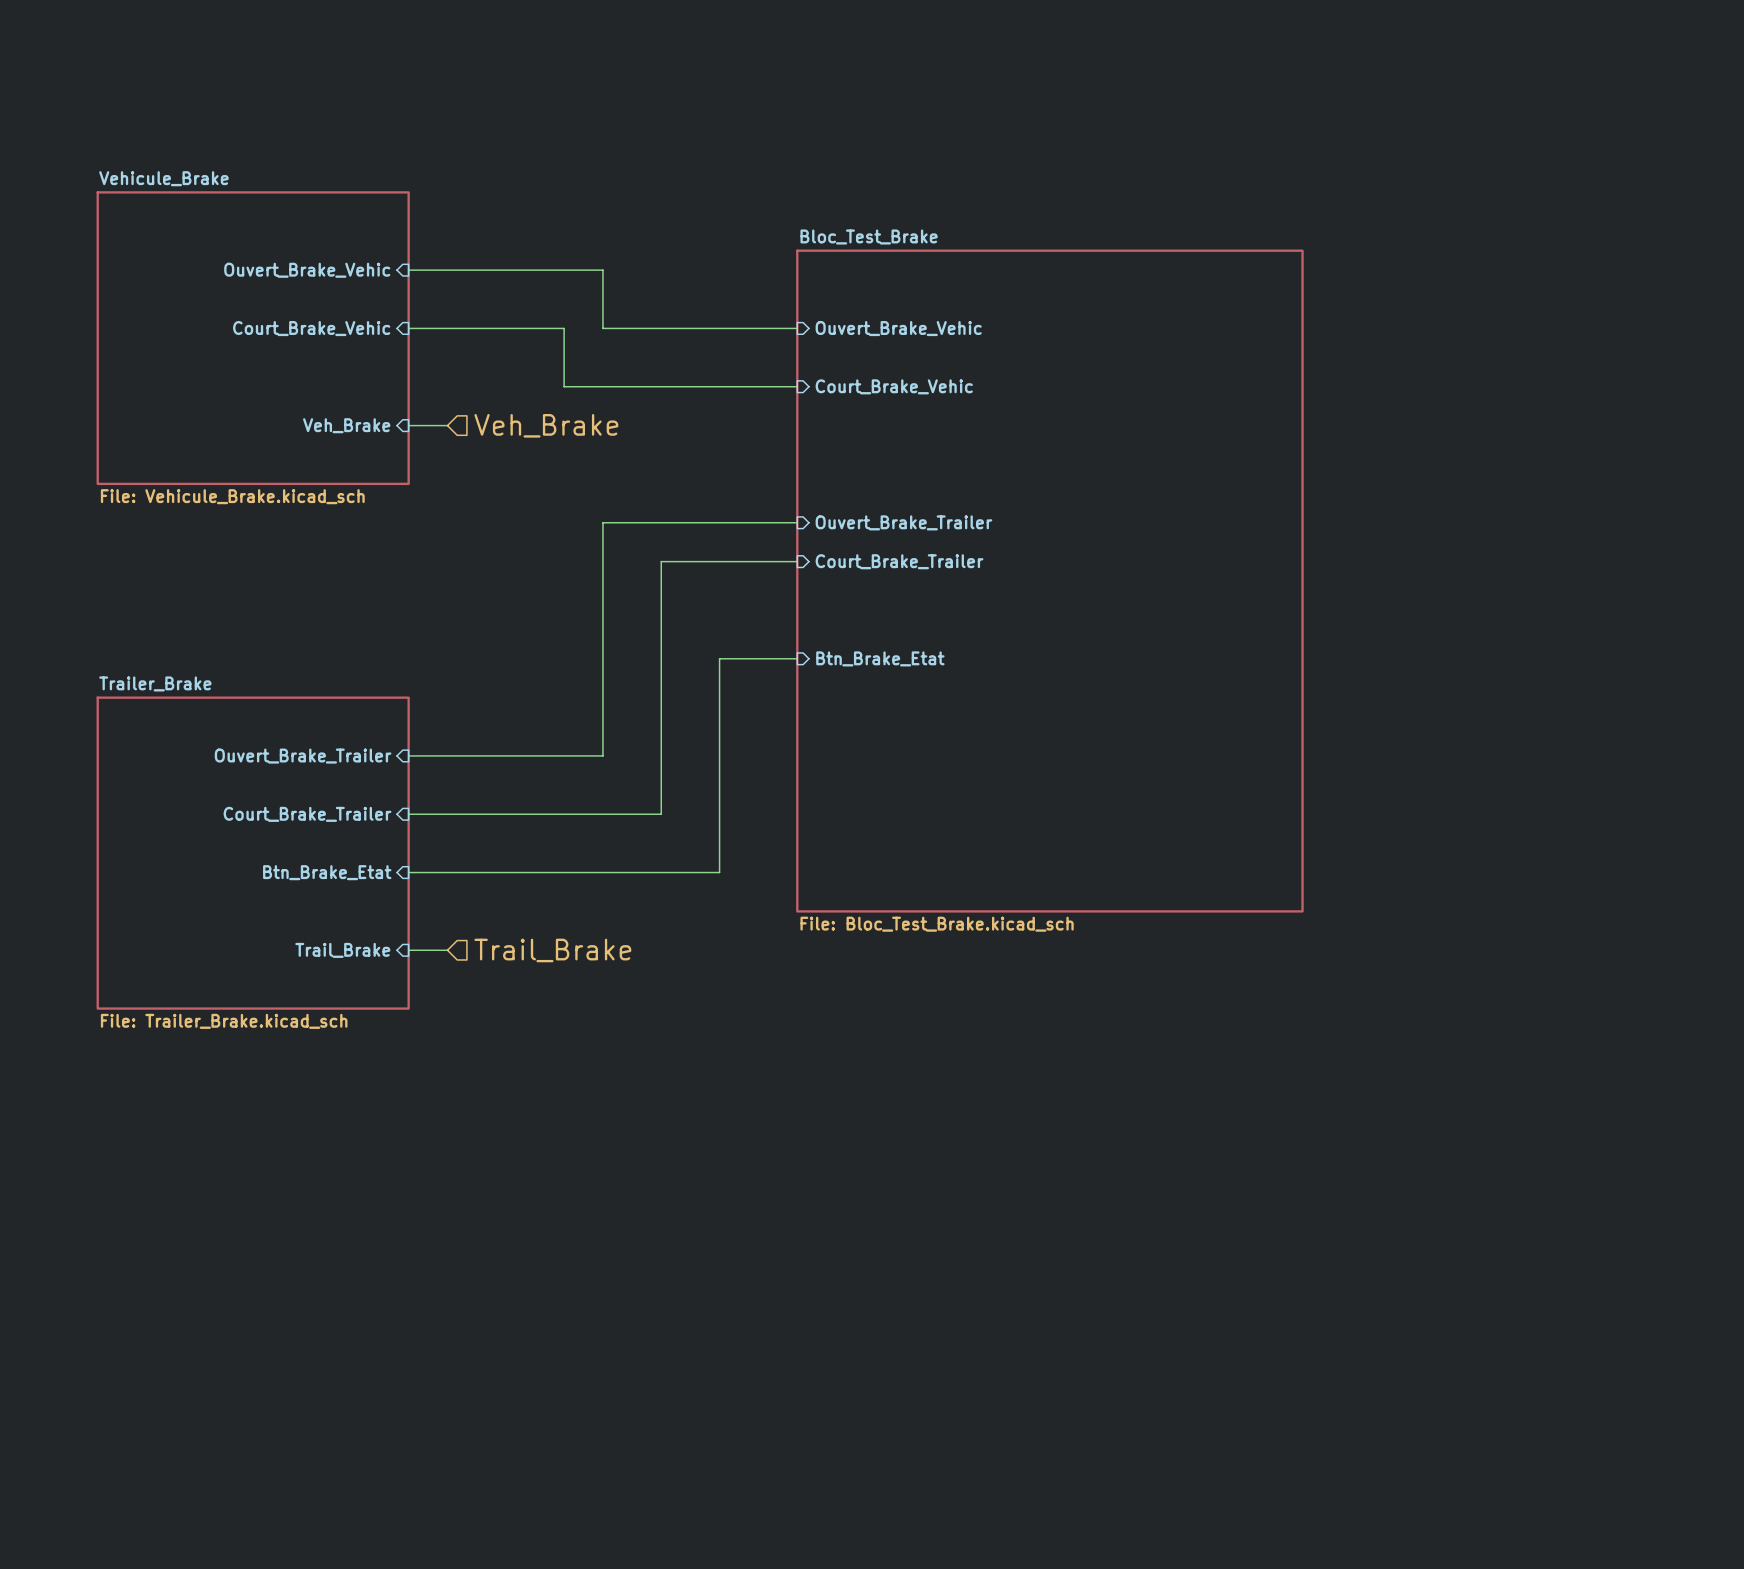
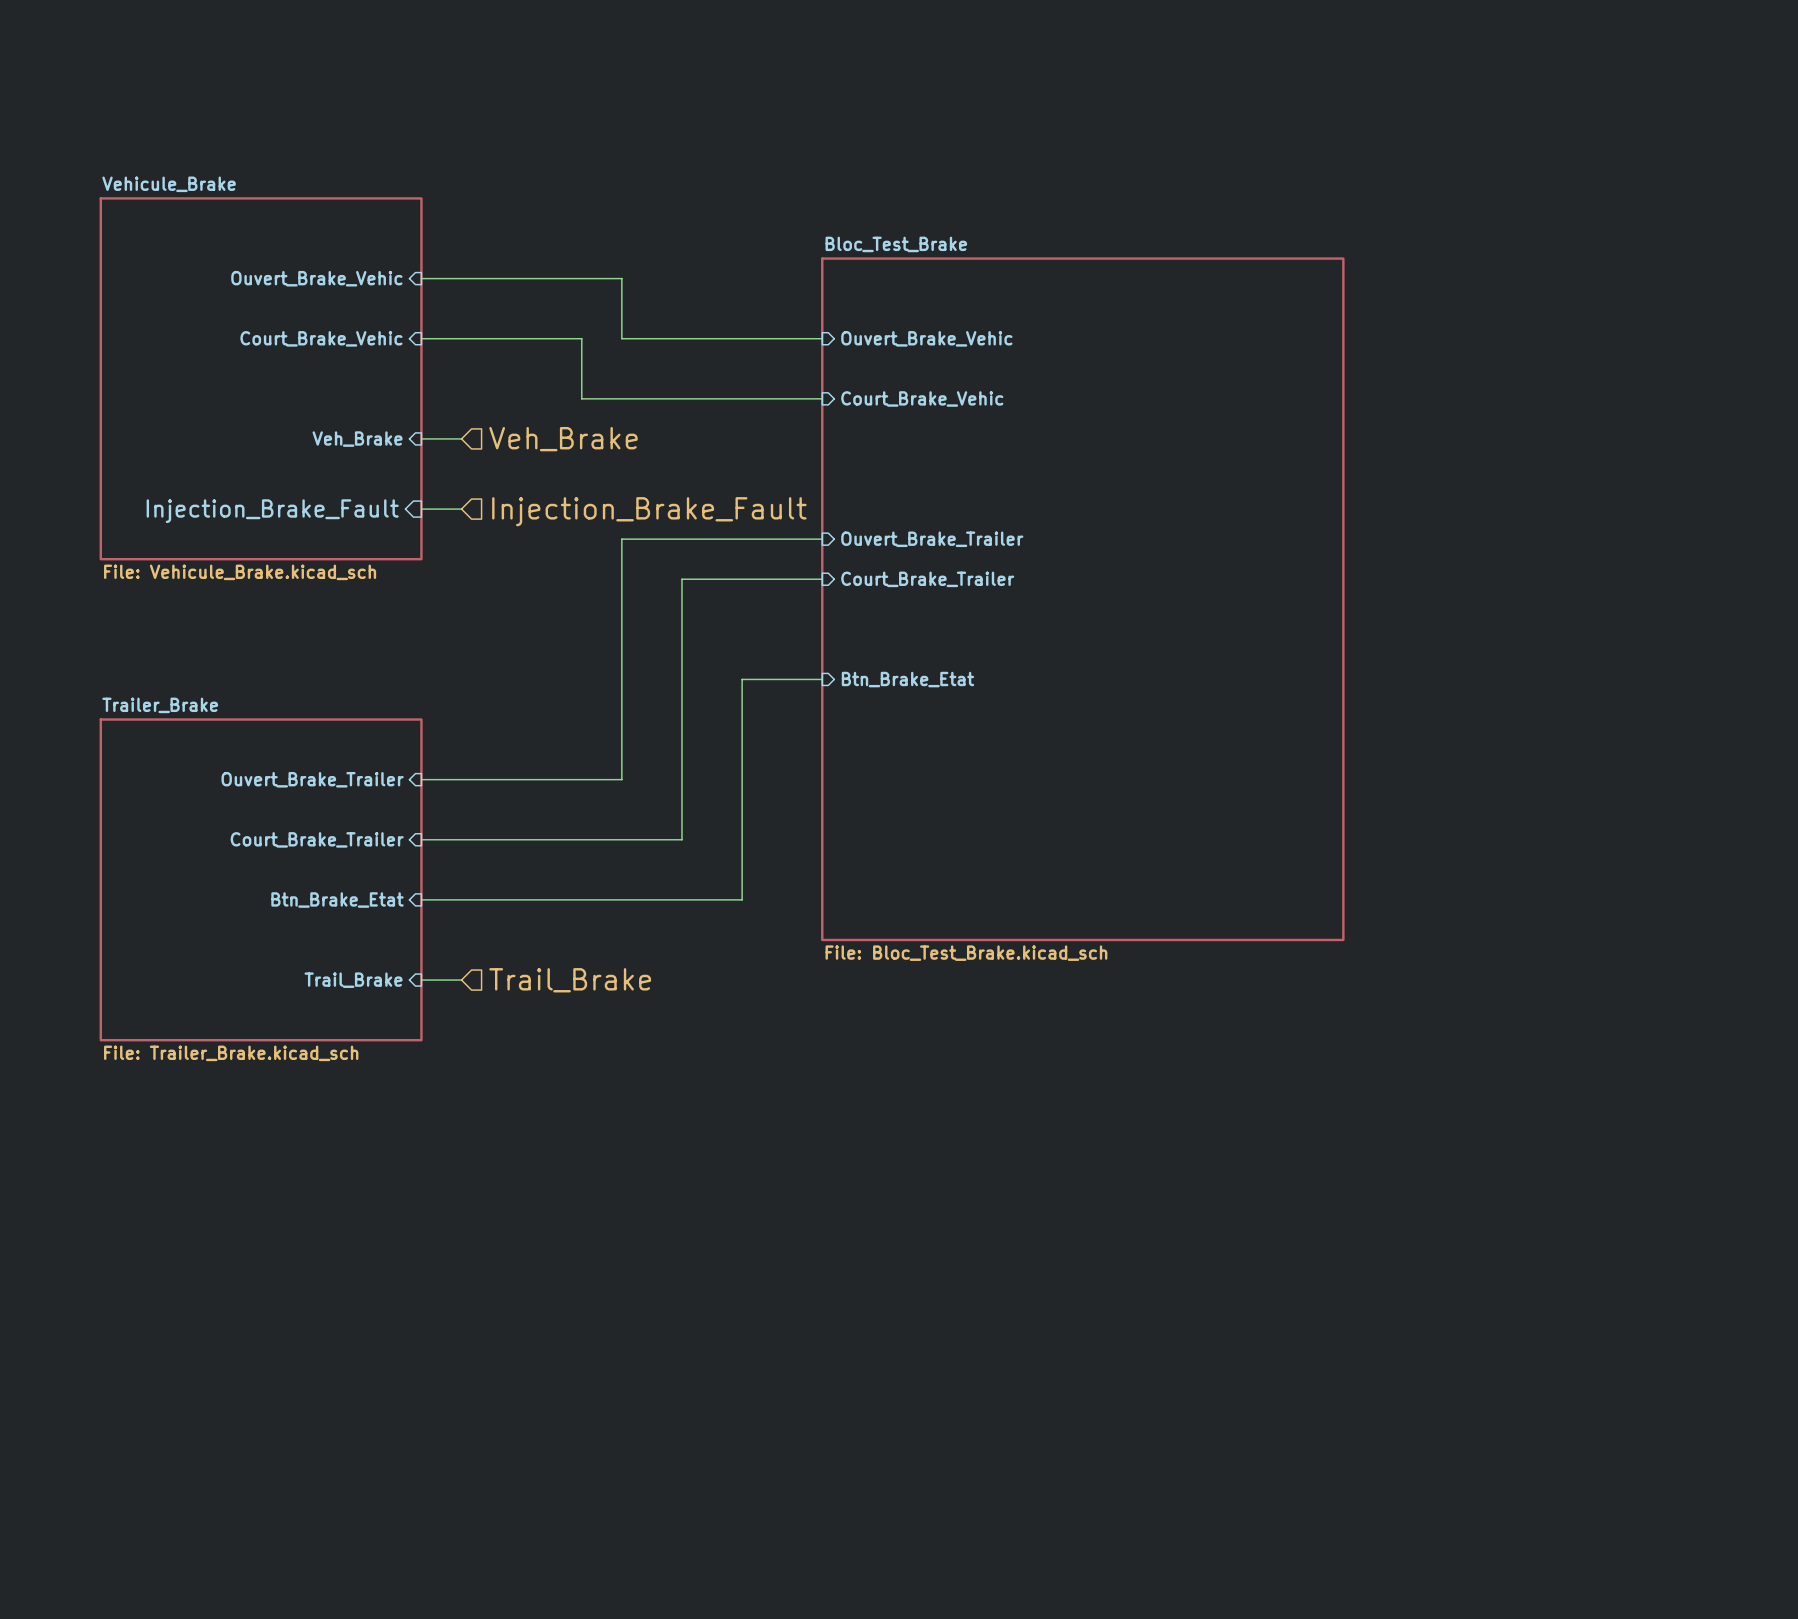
sheet Vehicule_Brake: File: Vehicule_Brake.kicad_sch (253, 338) -> none
sheet Vehicule_Brake: none -> File: Vehicule_Brake.kicad_sch (261, 378)
wire: none -> (421, 509) (461, 509)
sheet pin: none -> Injection_Brake_Fault (272, 511)
hierarchical label: none -> Injection_Brake_Fault (649, 511)

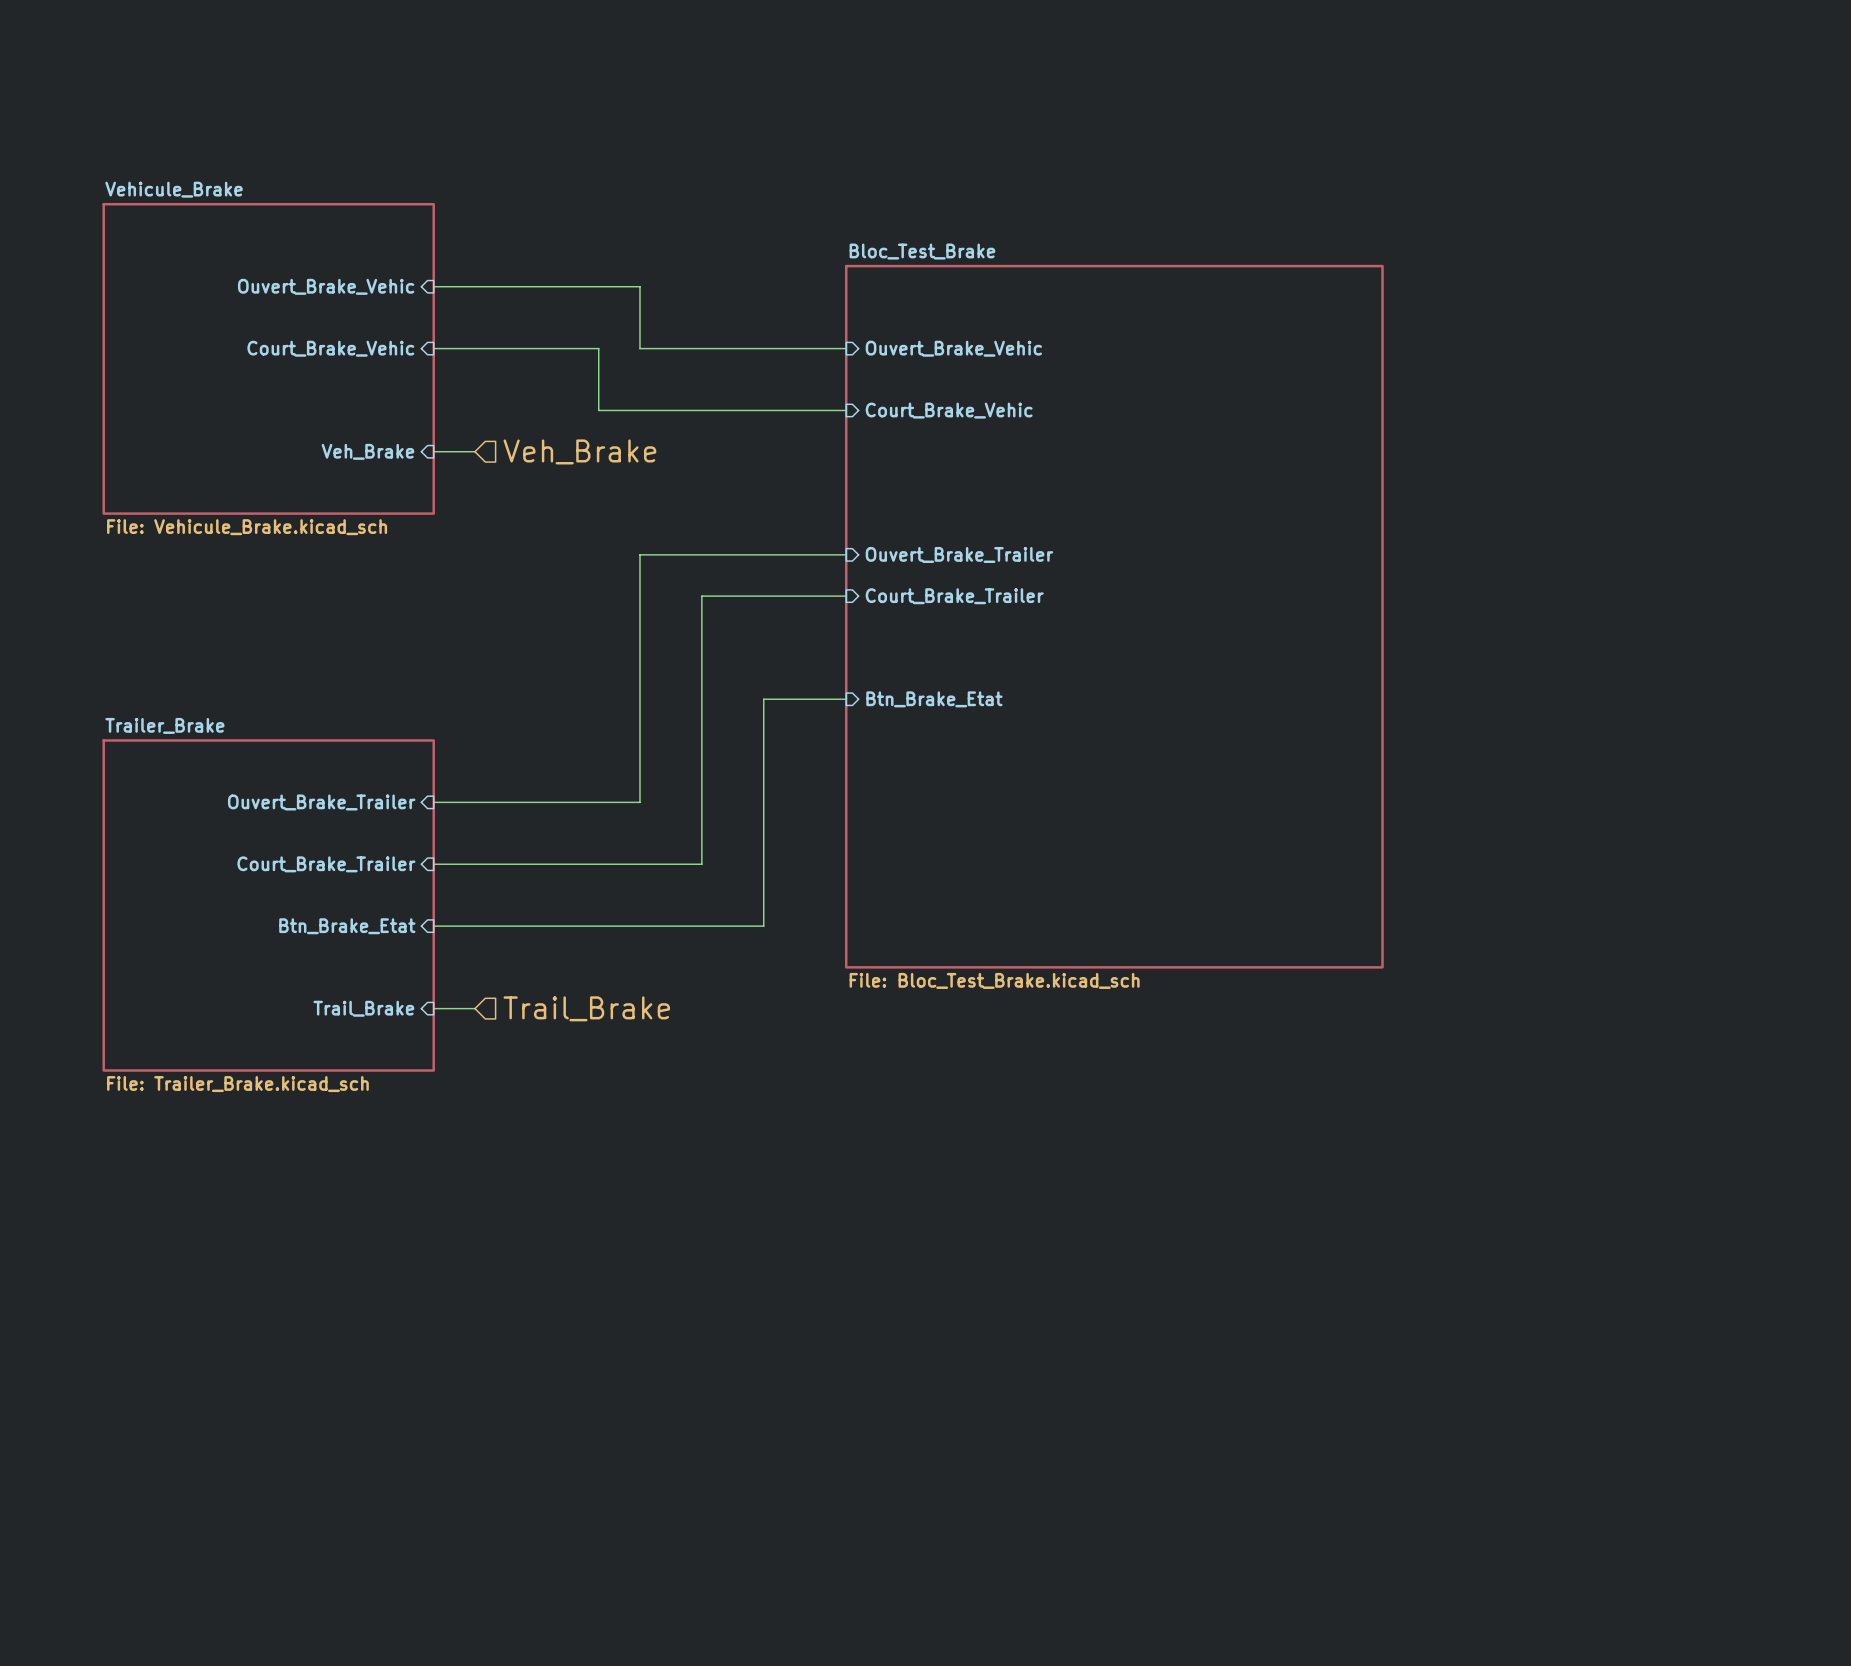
sheet Vehicule_Brake: none -> File: Vehicule_Brake.kicad_sch (268, 358)
sheet Vehicule_Brake: File: Vehicule_Brake.kicad_sch (261, 378) -> none
wire: (421, 509) (461, 509) -> none
sheet pin: Injection_Brake_Fault (272, 511) -> none
hierarchical label: Injection_Brake_Fault (649, 511) -> none

